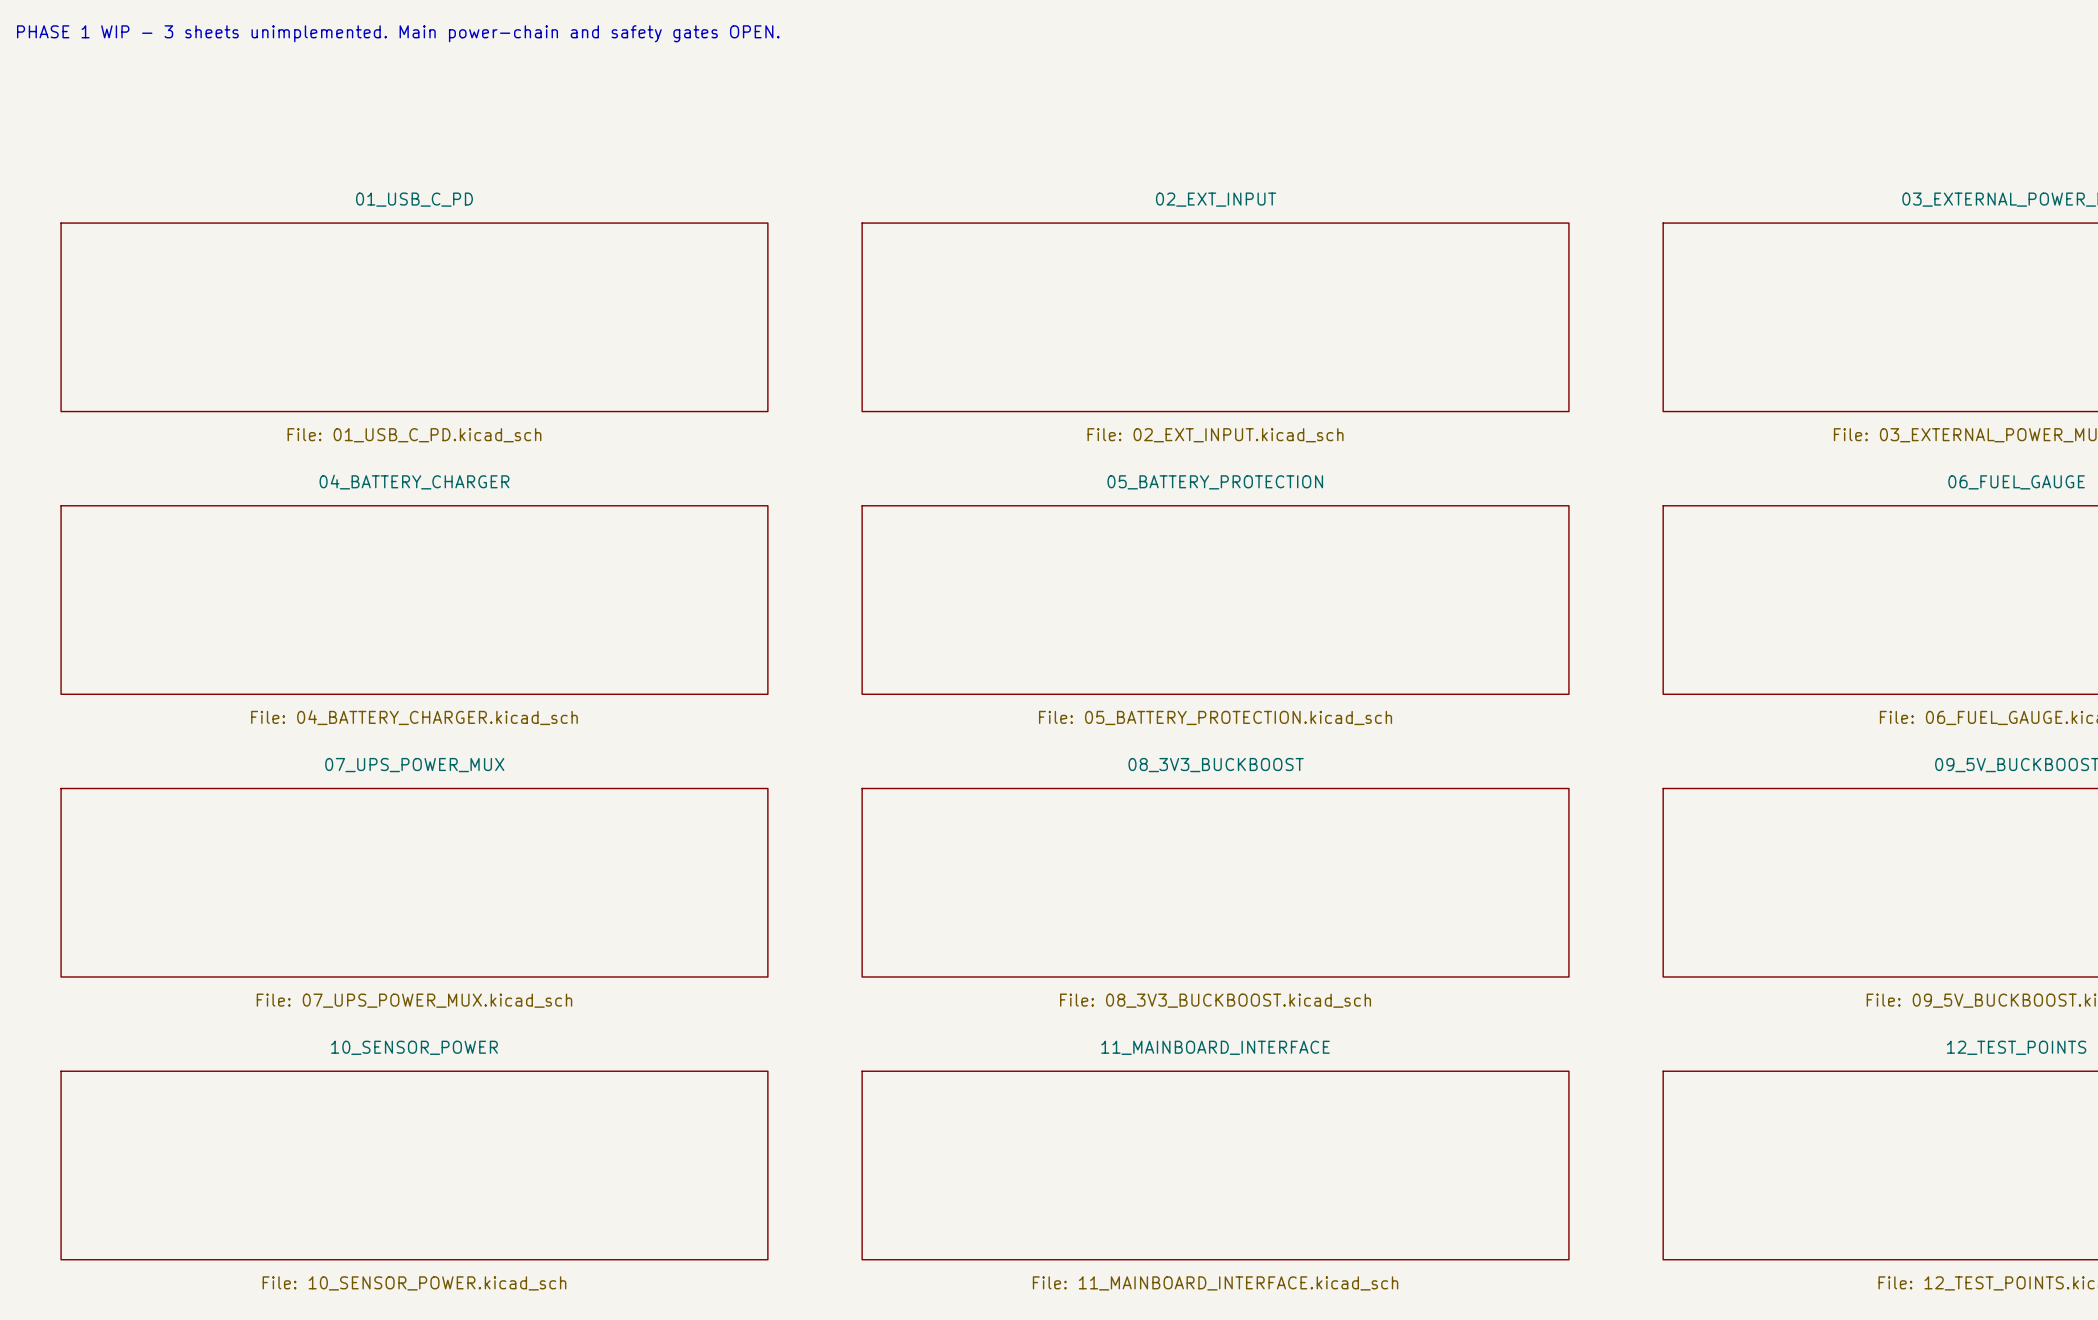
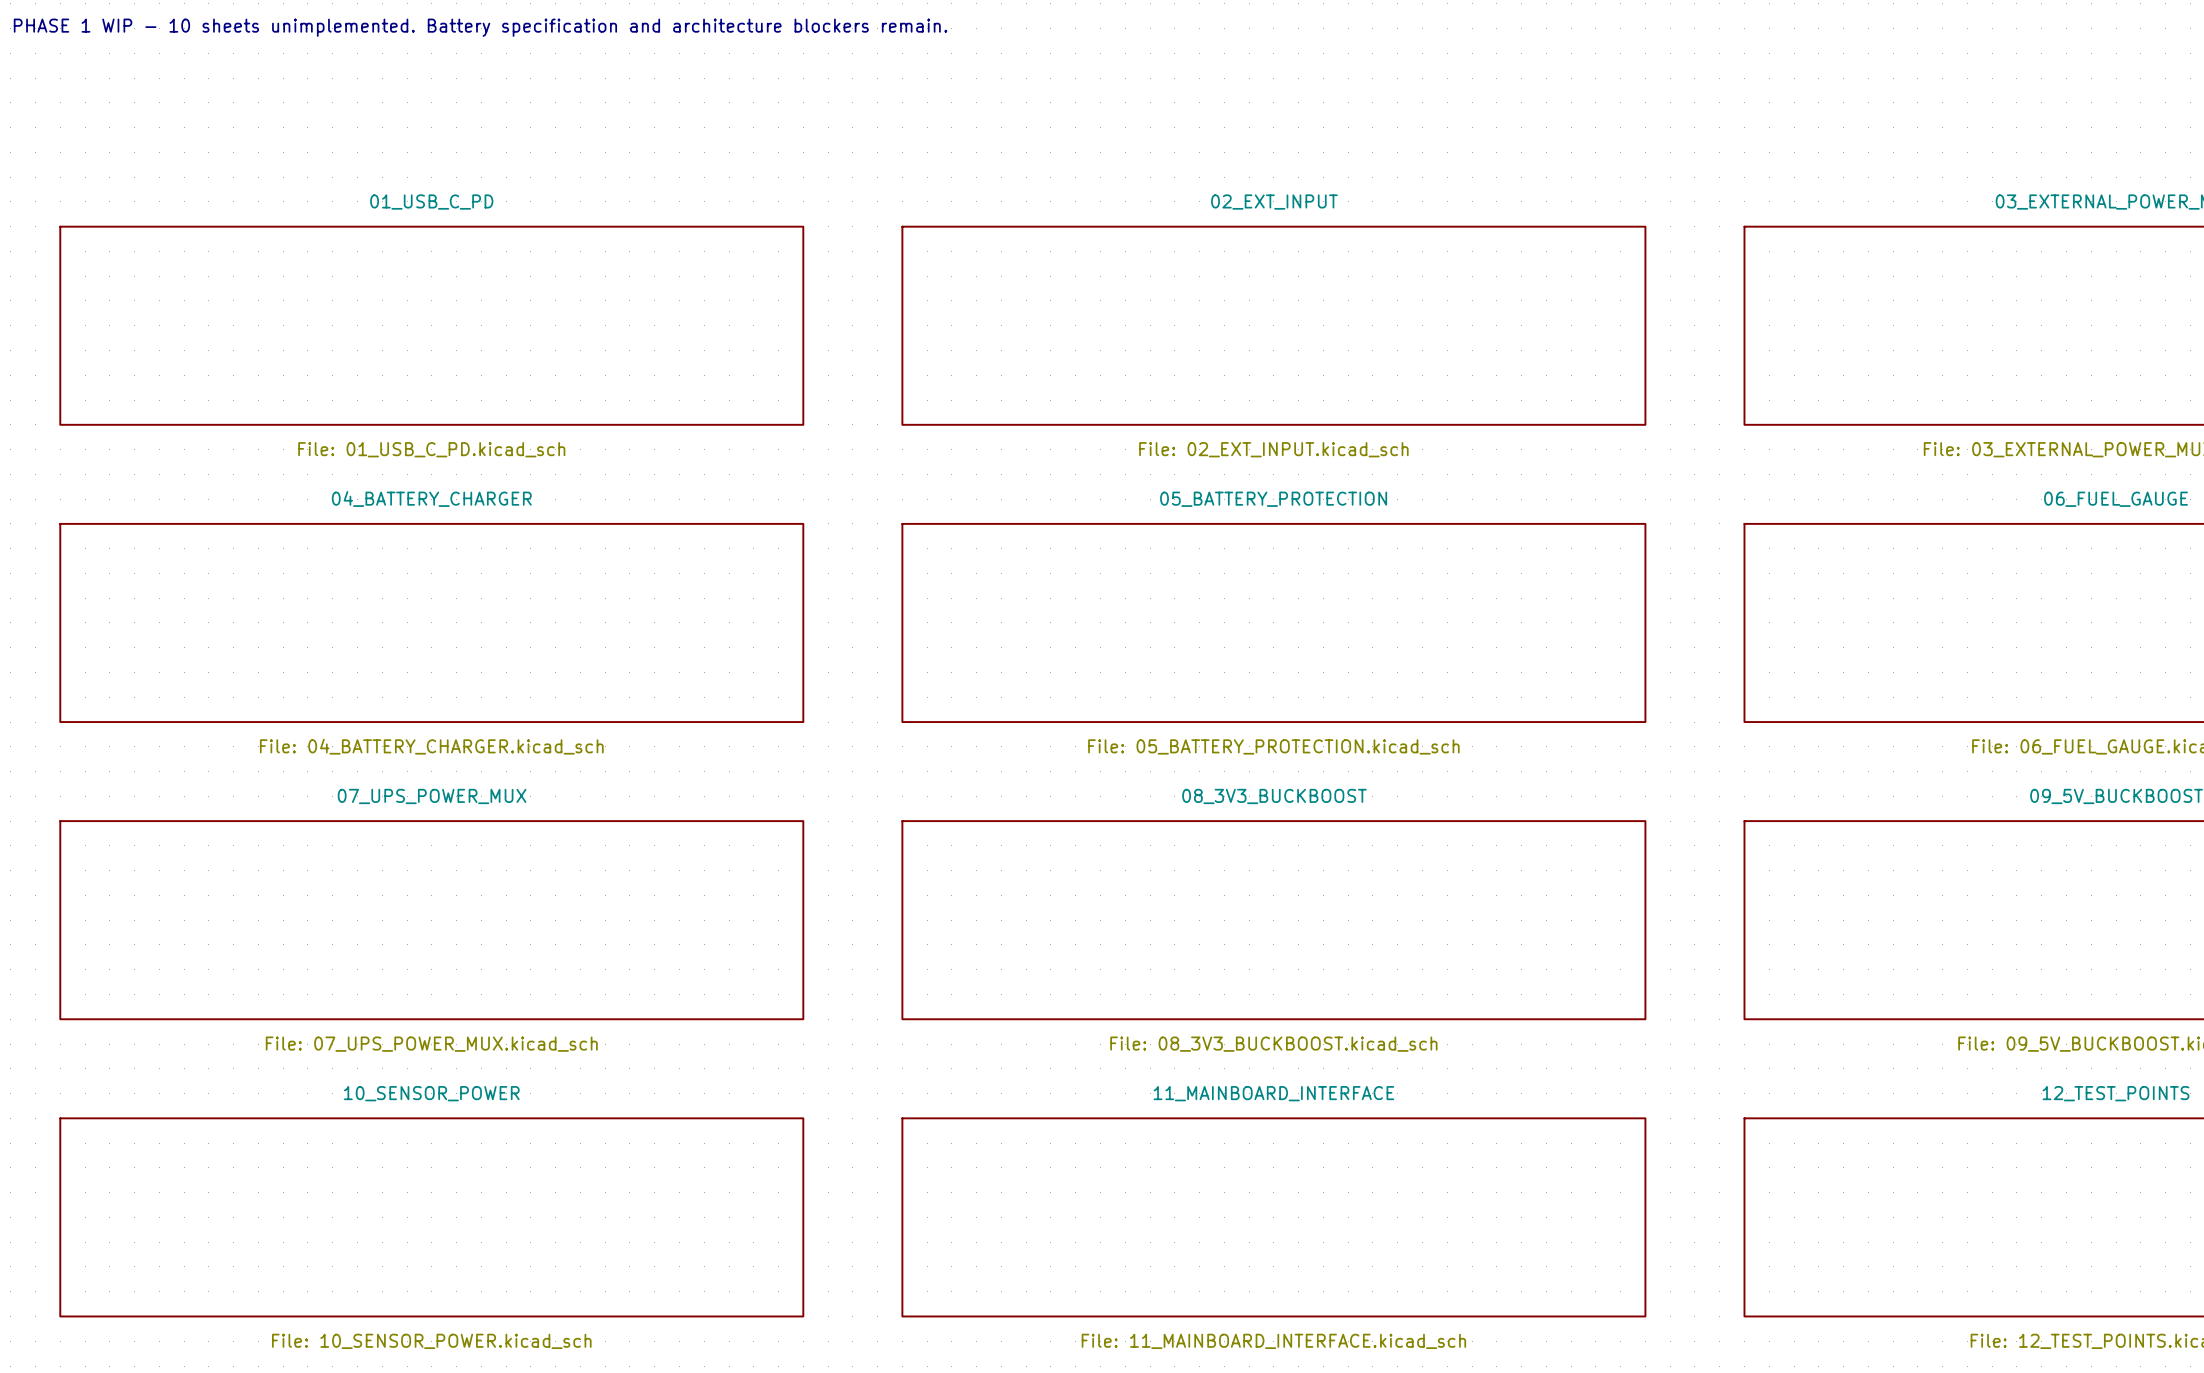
text: PHASE 1 WIP - 3 sheets unimplemented. Main power-chain and safety gates OPEN. (398, 33) -> PHASE 1 WIP - 10 sheets unimplemented. Battery specification and architecture blockers remain. (480, 27)

